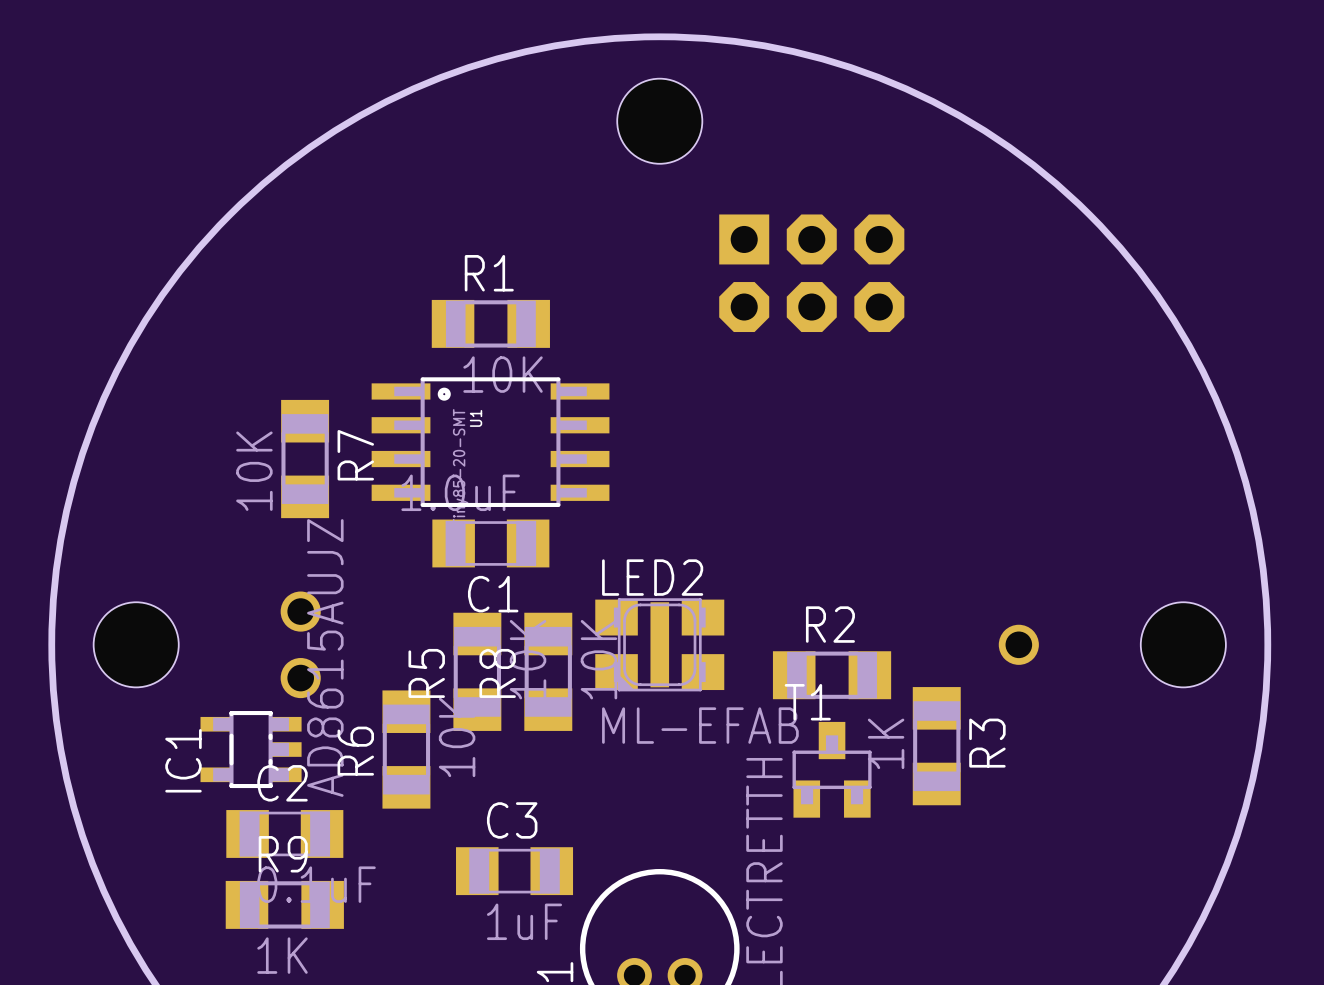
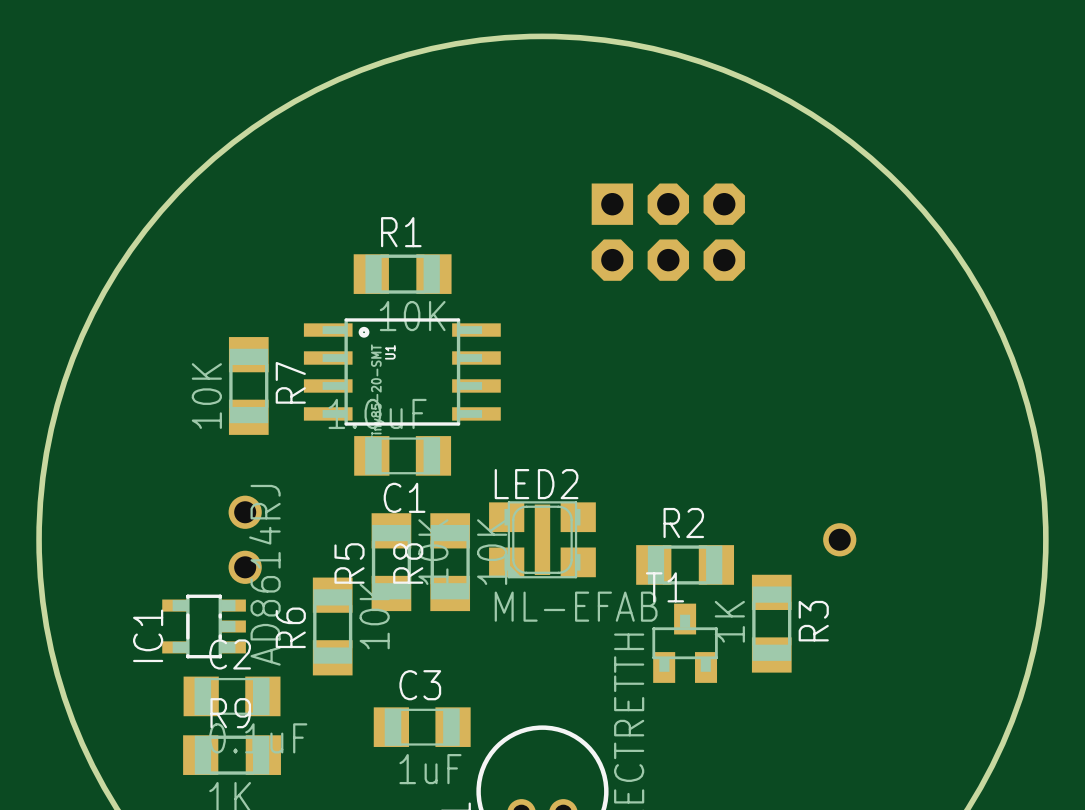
hole: (659, 121) -> none
hole: (136, 644) -> none
hole: (1183, 644) -> none
IC1 value: AD8615AUJZ (325, 657) -> AD8614RJ (264, 575)

